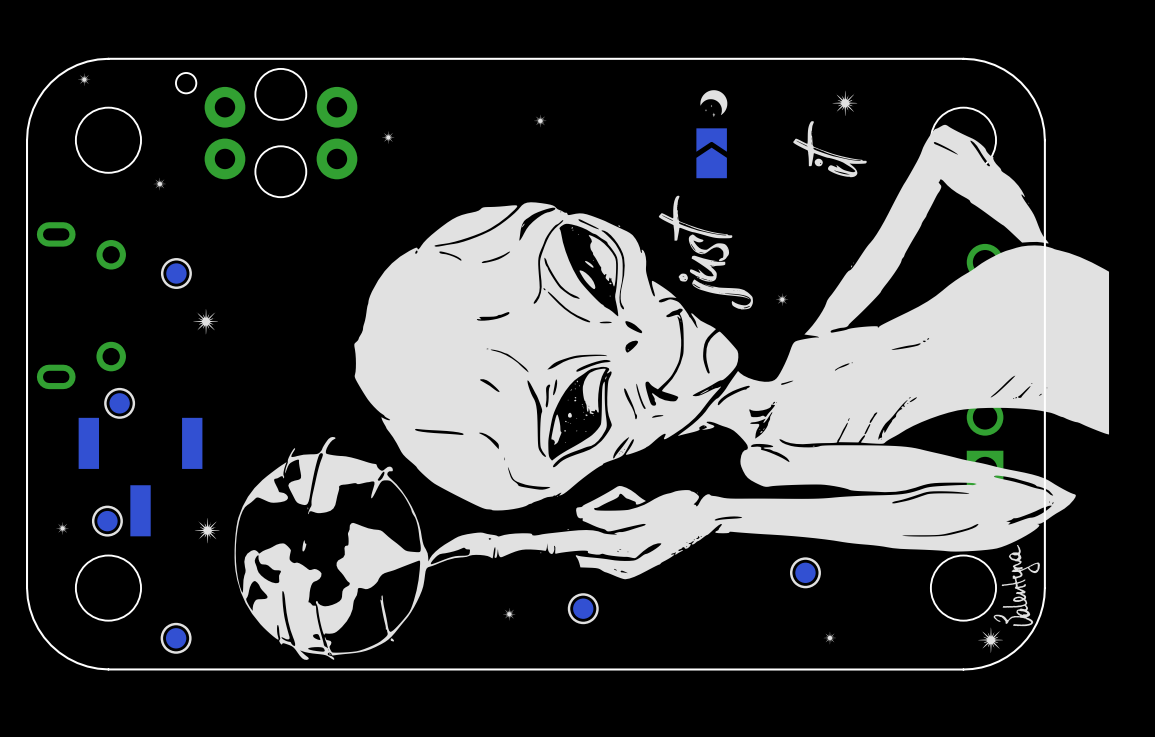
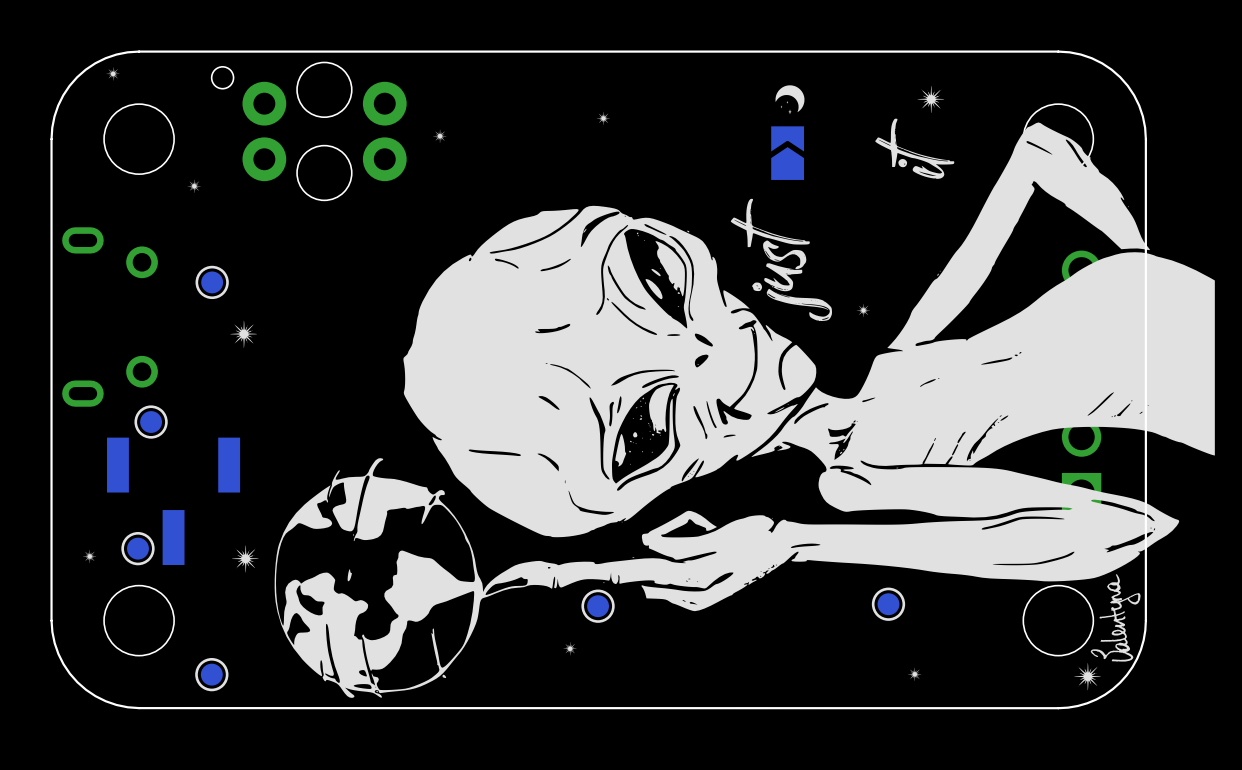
part position: (583, 608) -> (598, 606)

